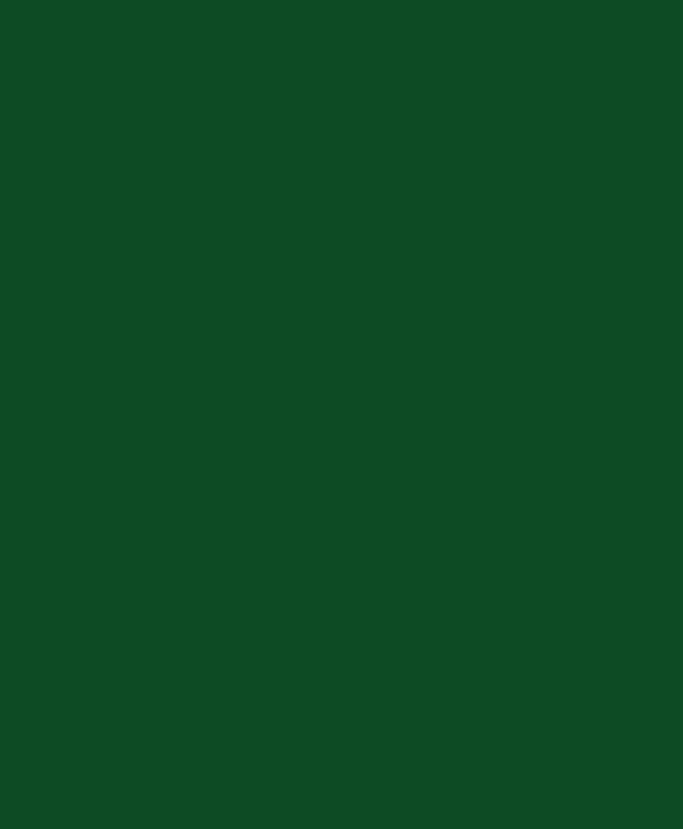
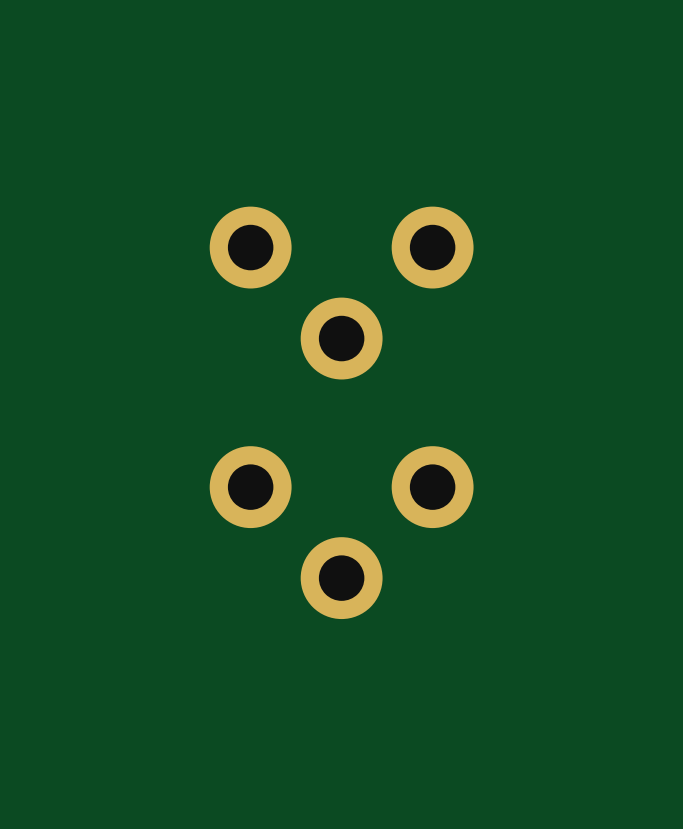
part: none -> (341, 293)
part: none -> (341, 532)

